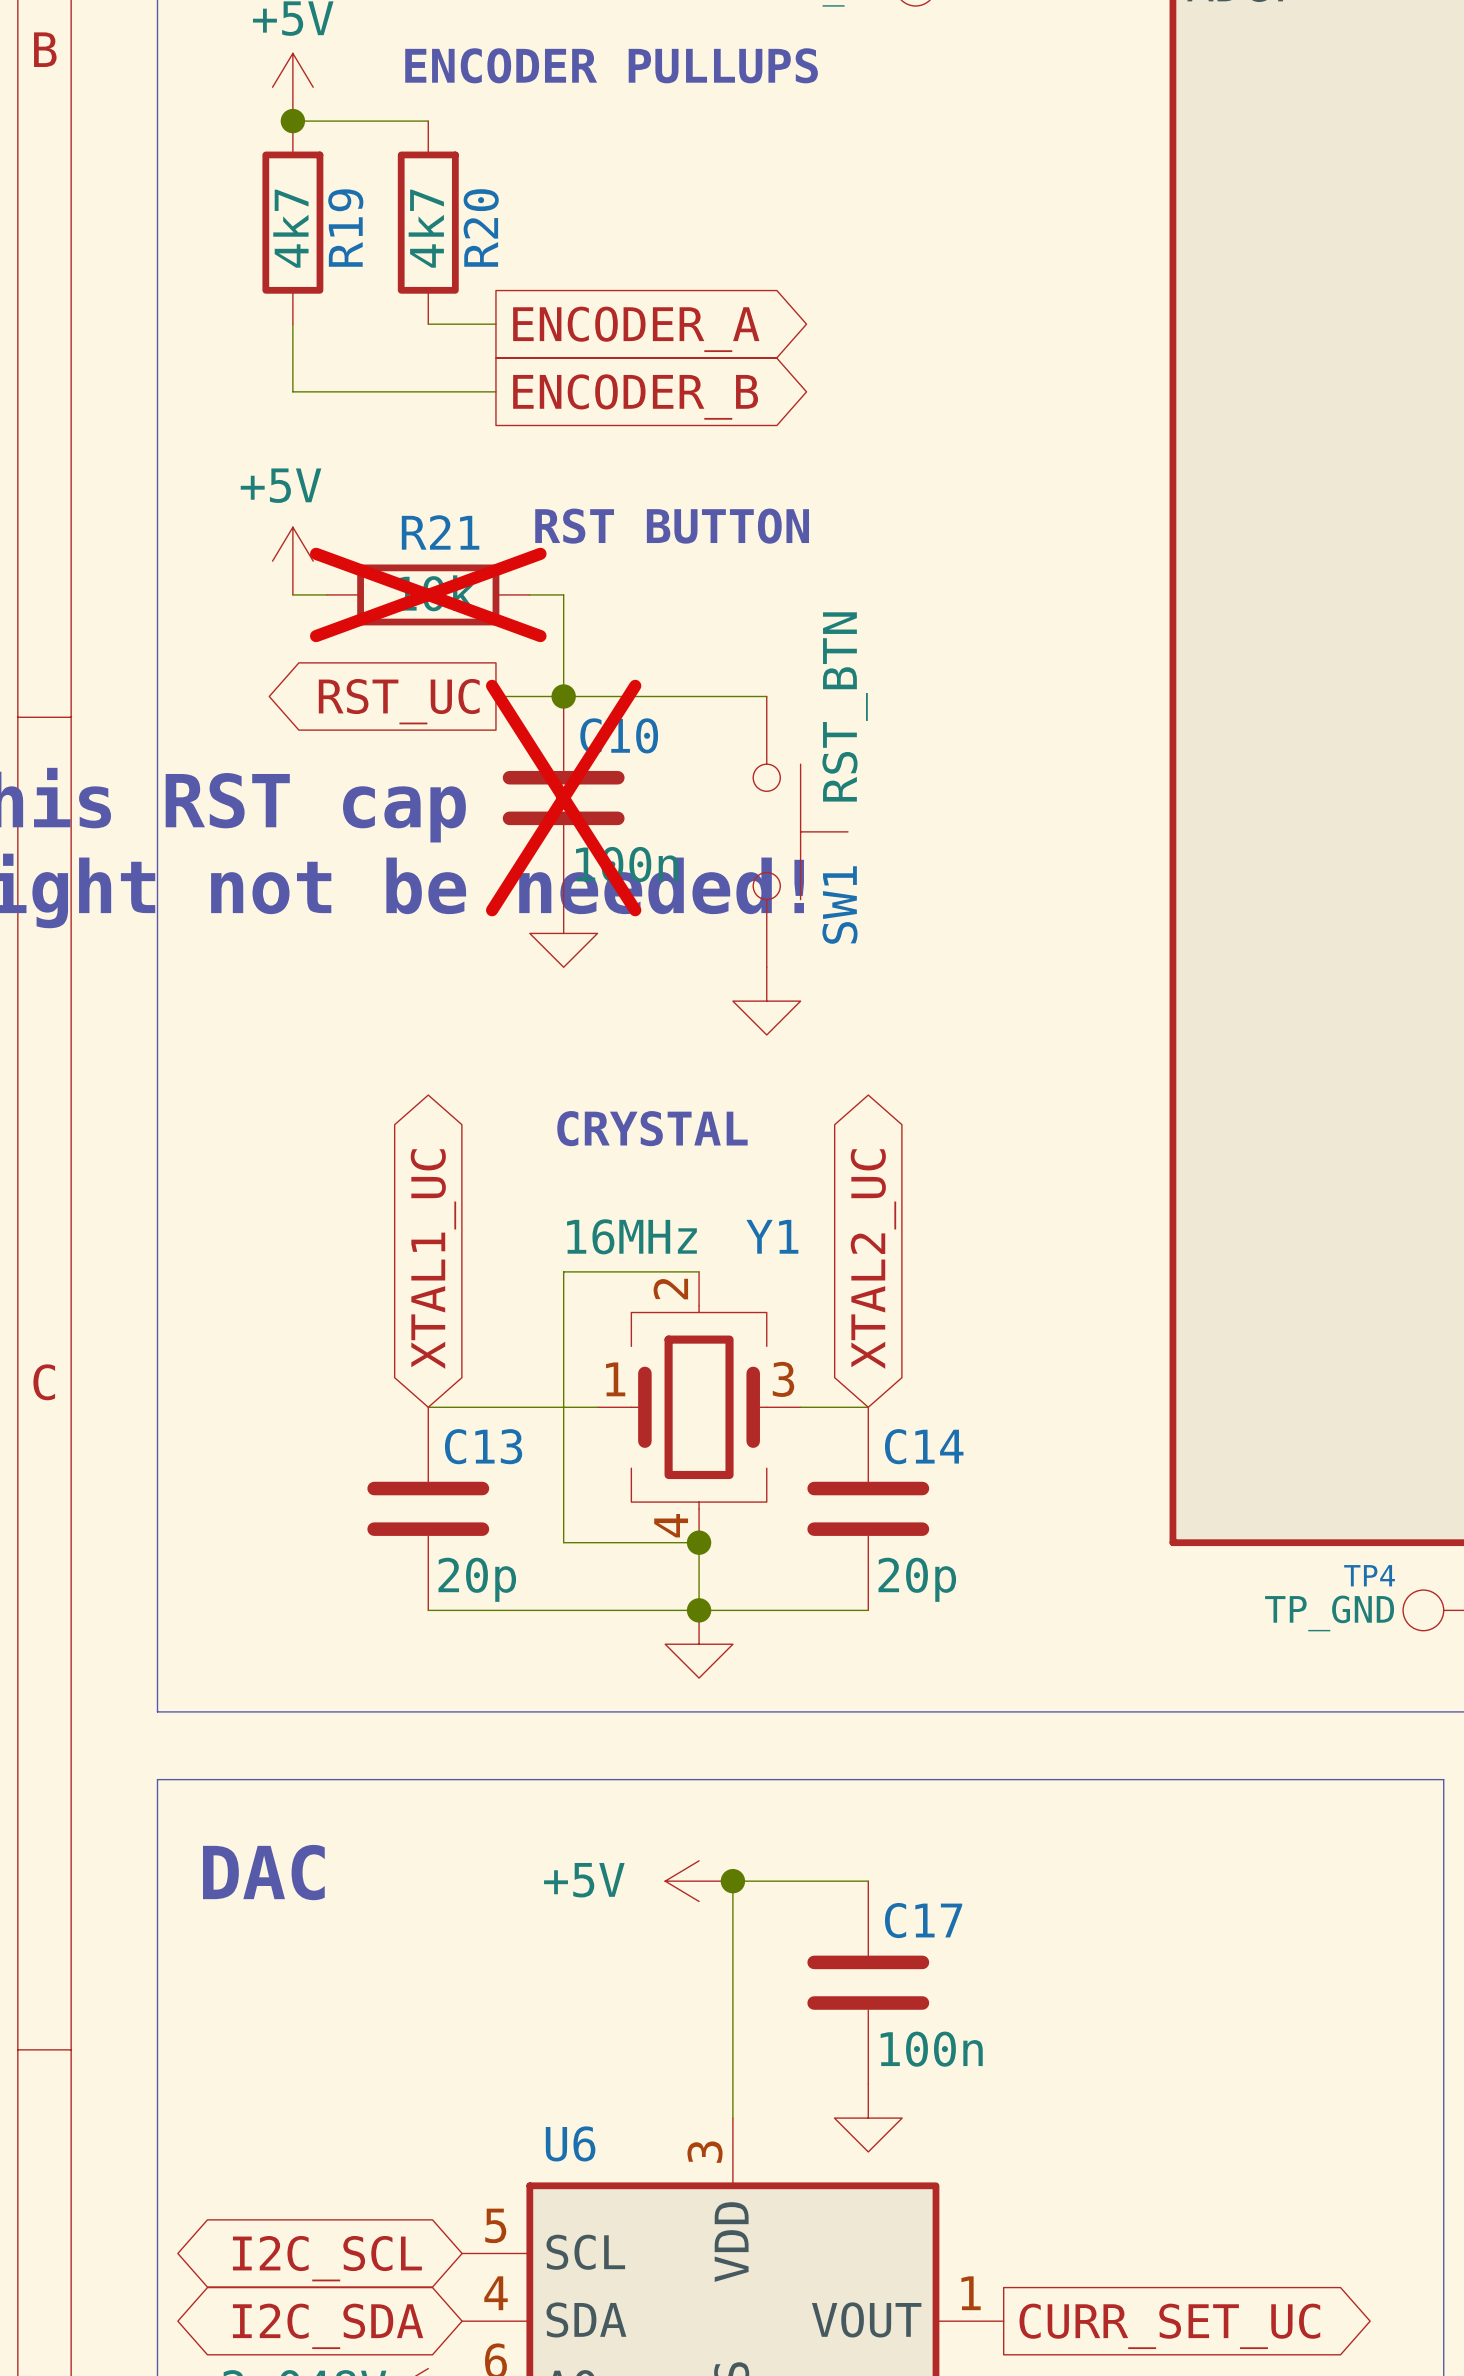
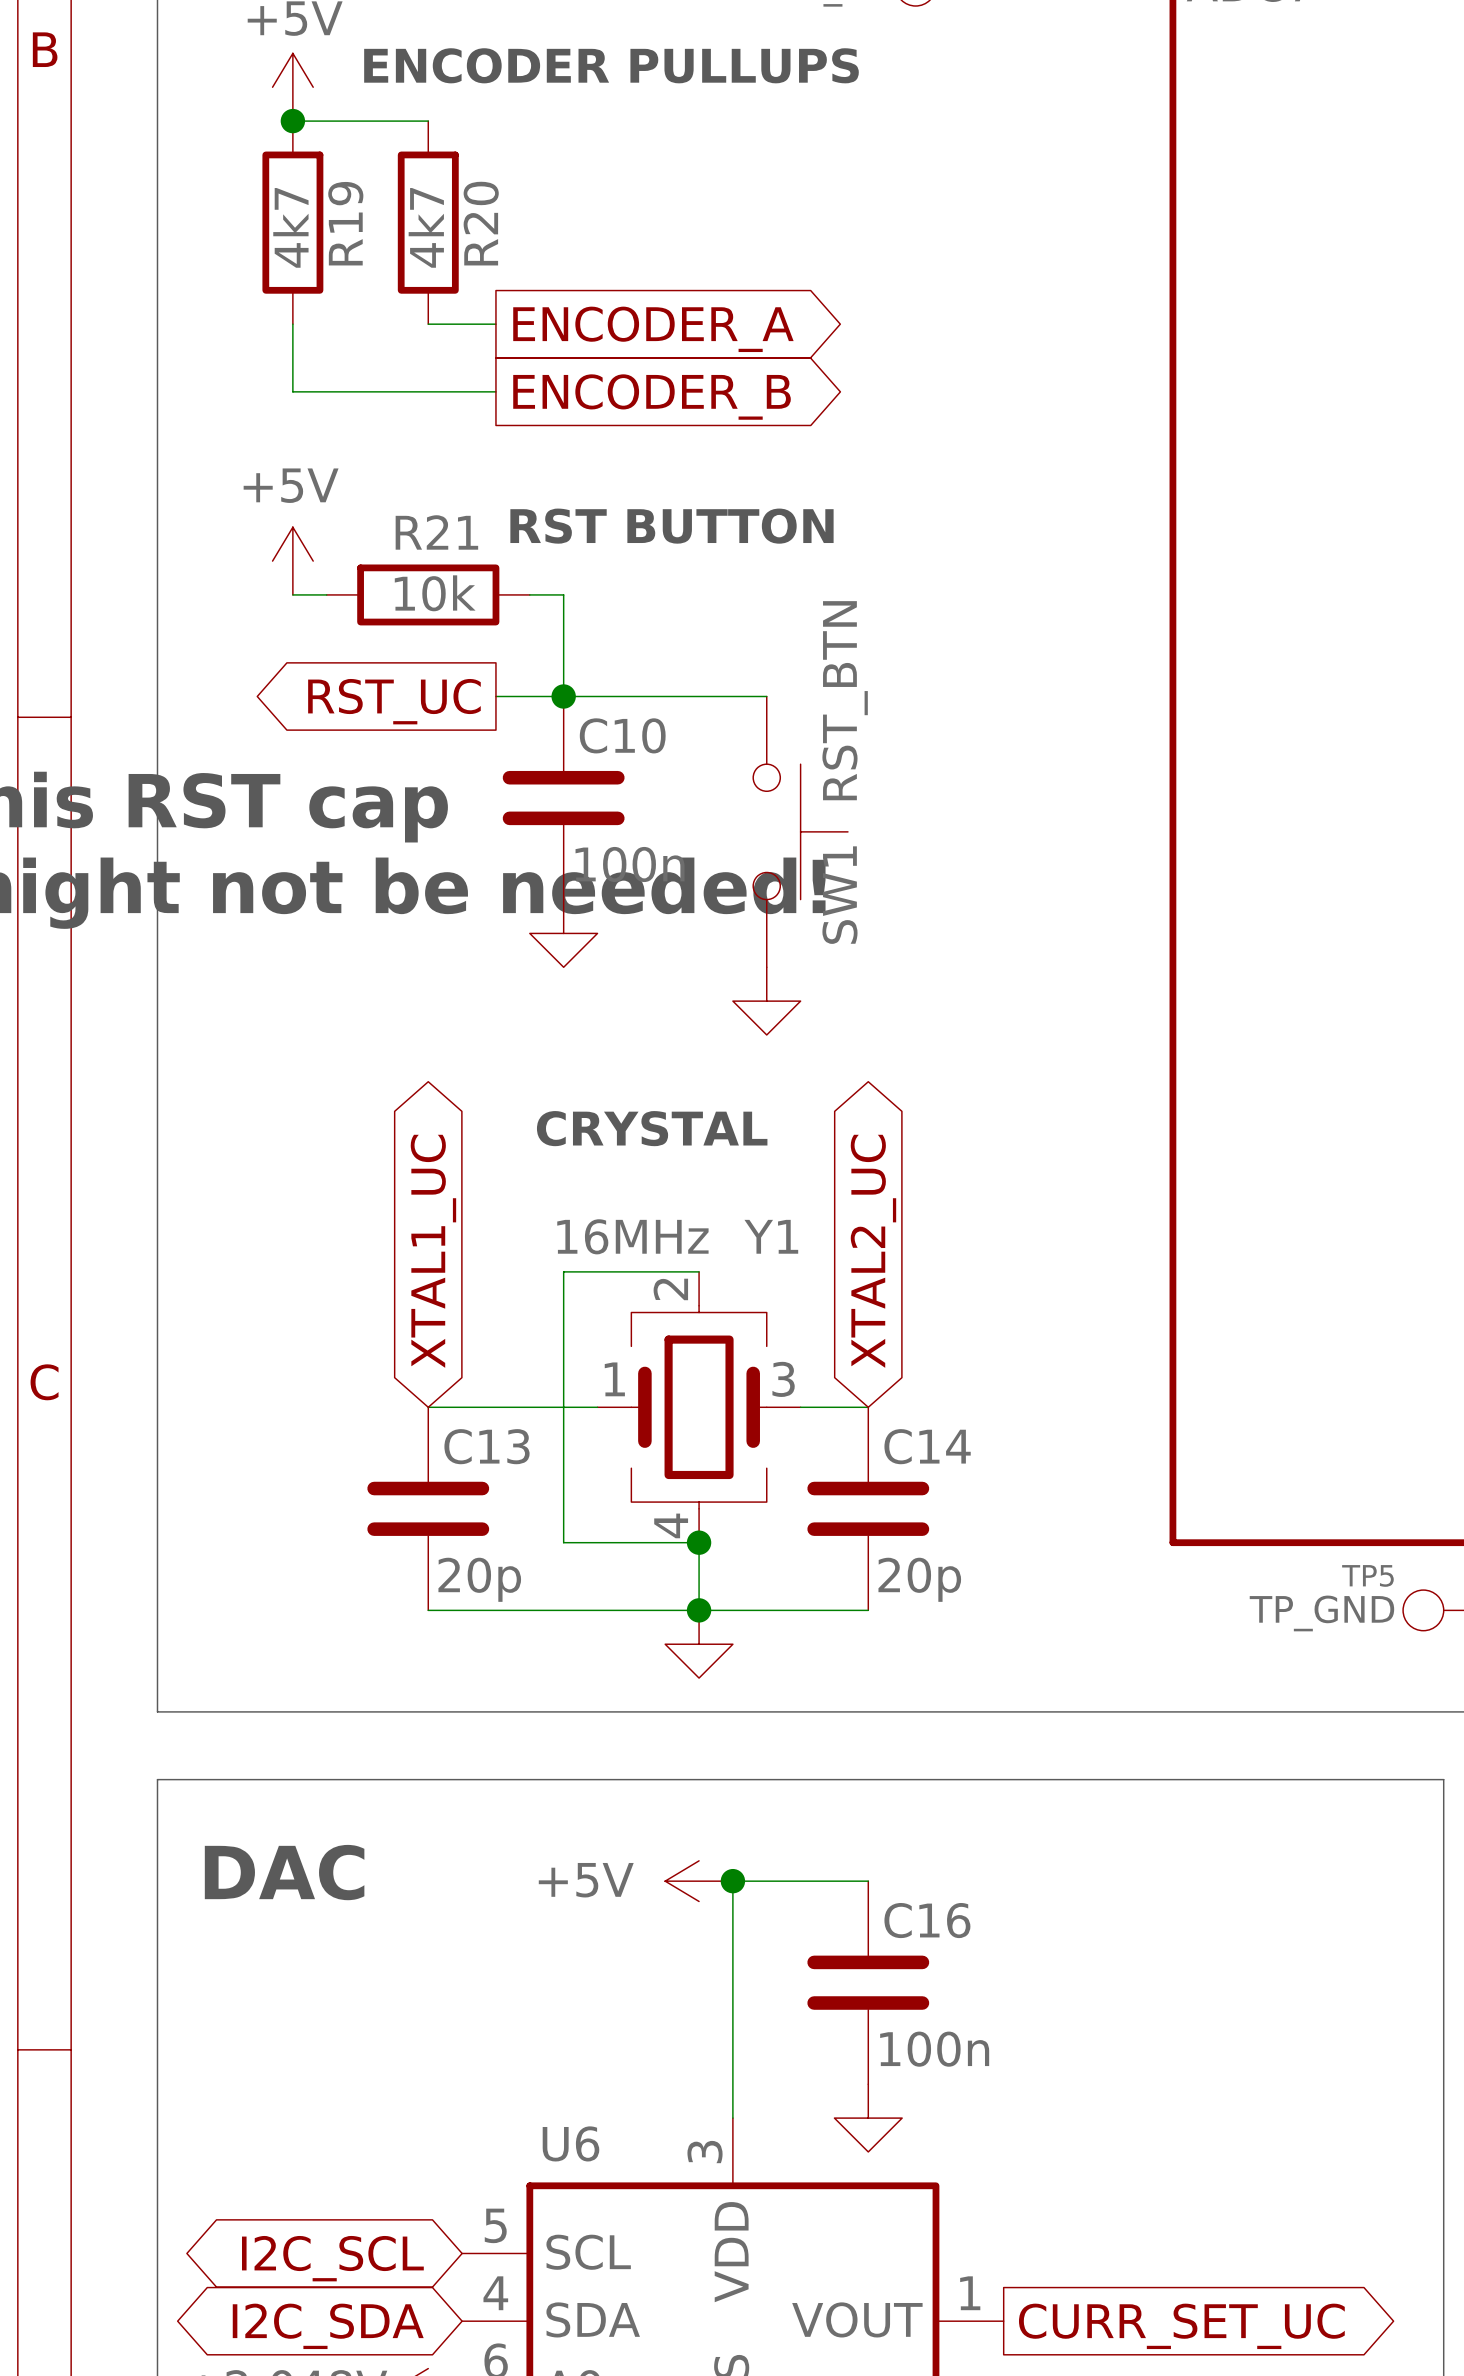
R21 do-not-place cross: (428, 594) -> none
C10 do-not-place cross: (563, 798) -> none
TP4 name: TP4 (1369, 1575) -> TP5 (1367, 1575)
C17 name: C17 (923, 1920) -> C16 (927, 1920)

